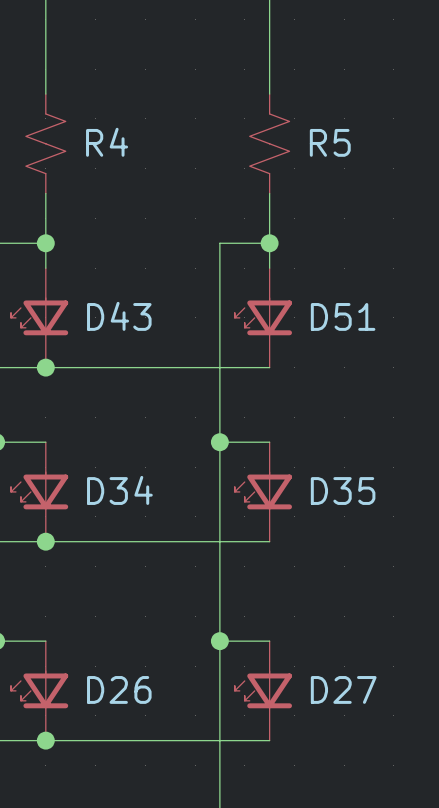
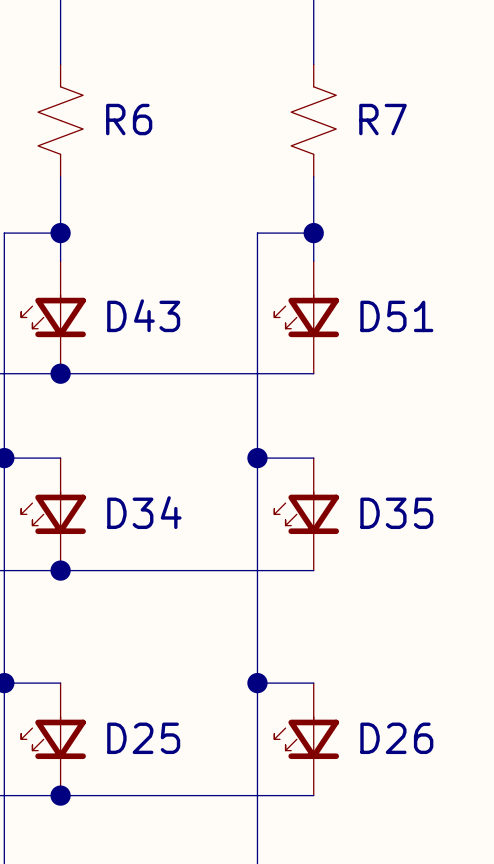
R4 name: R4 (107, 142) -> R6 (129, 119)
R5 name: R5 (330, 142) -> R7 (382, 119)
D26 name: D26 (119, 689) -> D25 (143, 738)
D27 name: D27 (343, 689) -> D26 (396, 738)

